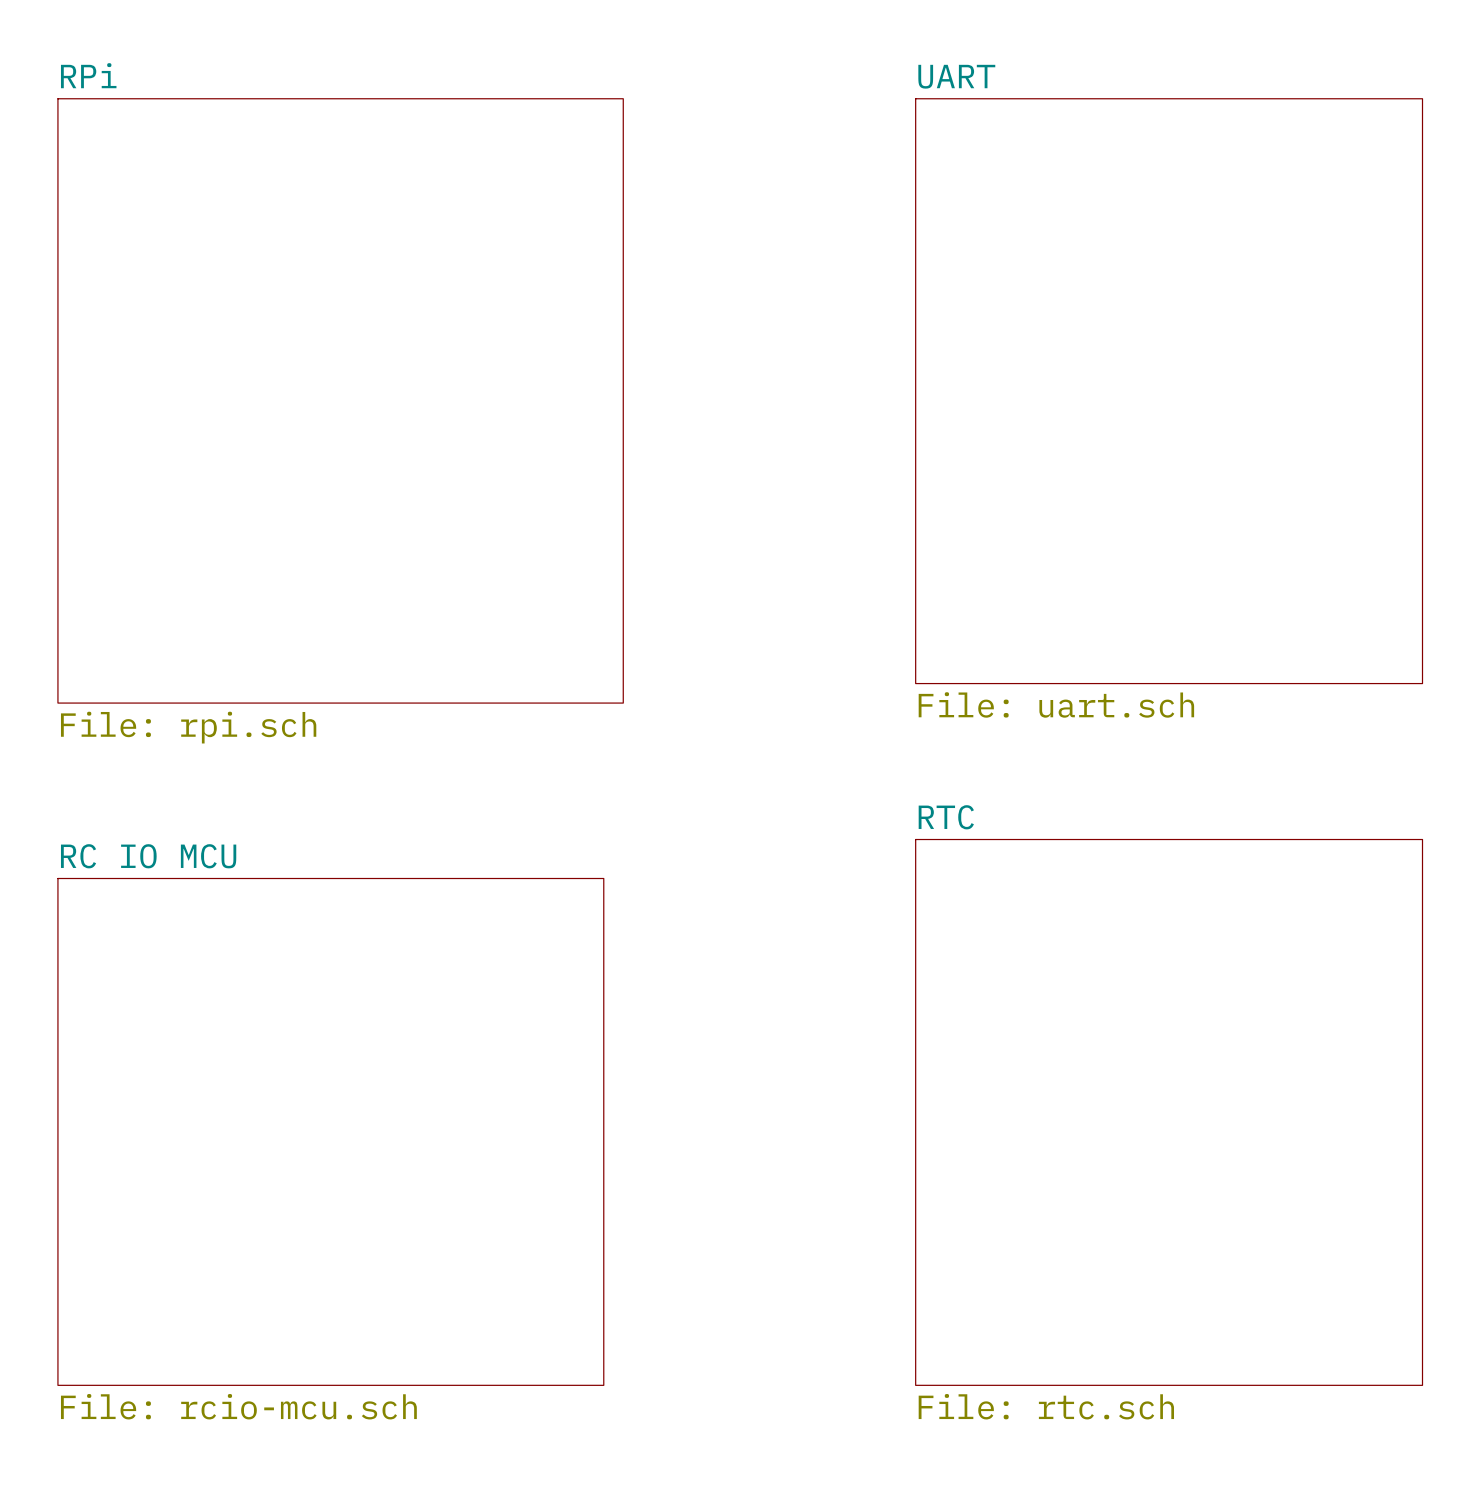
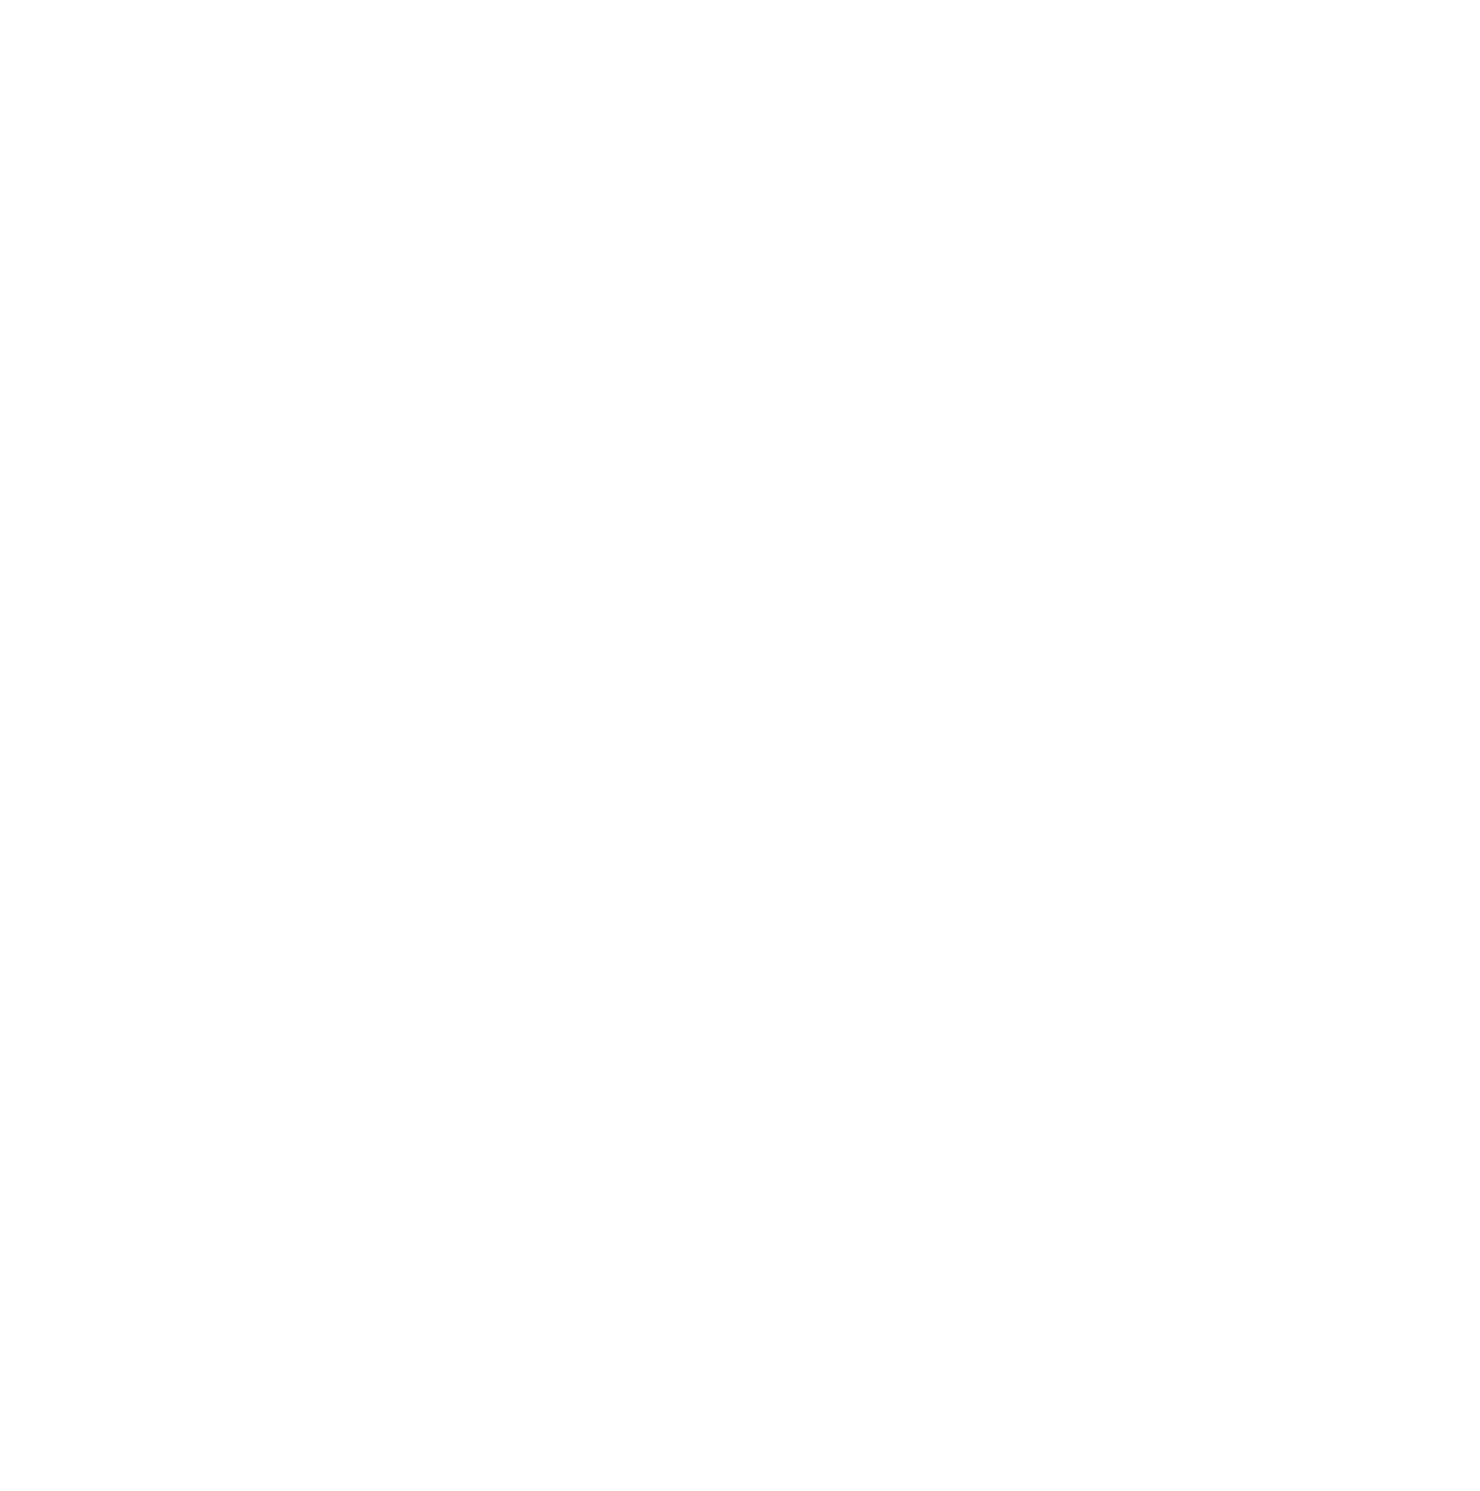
sheet UART: File: uart.sch (1169, 391) -> none
sheet RPi: File: rpi.sch (340, 400) -> none
sheet RTC: File: rtc.sch (1169, 1112) -> none
sheet RC IO MCU: File: rcio-mcu.sch (330, 1131) -> none

